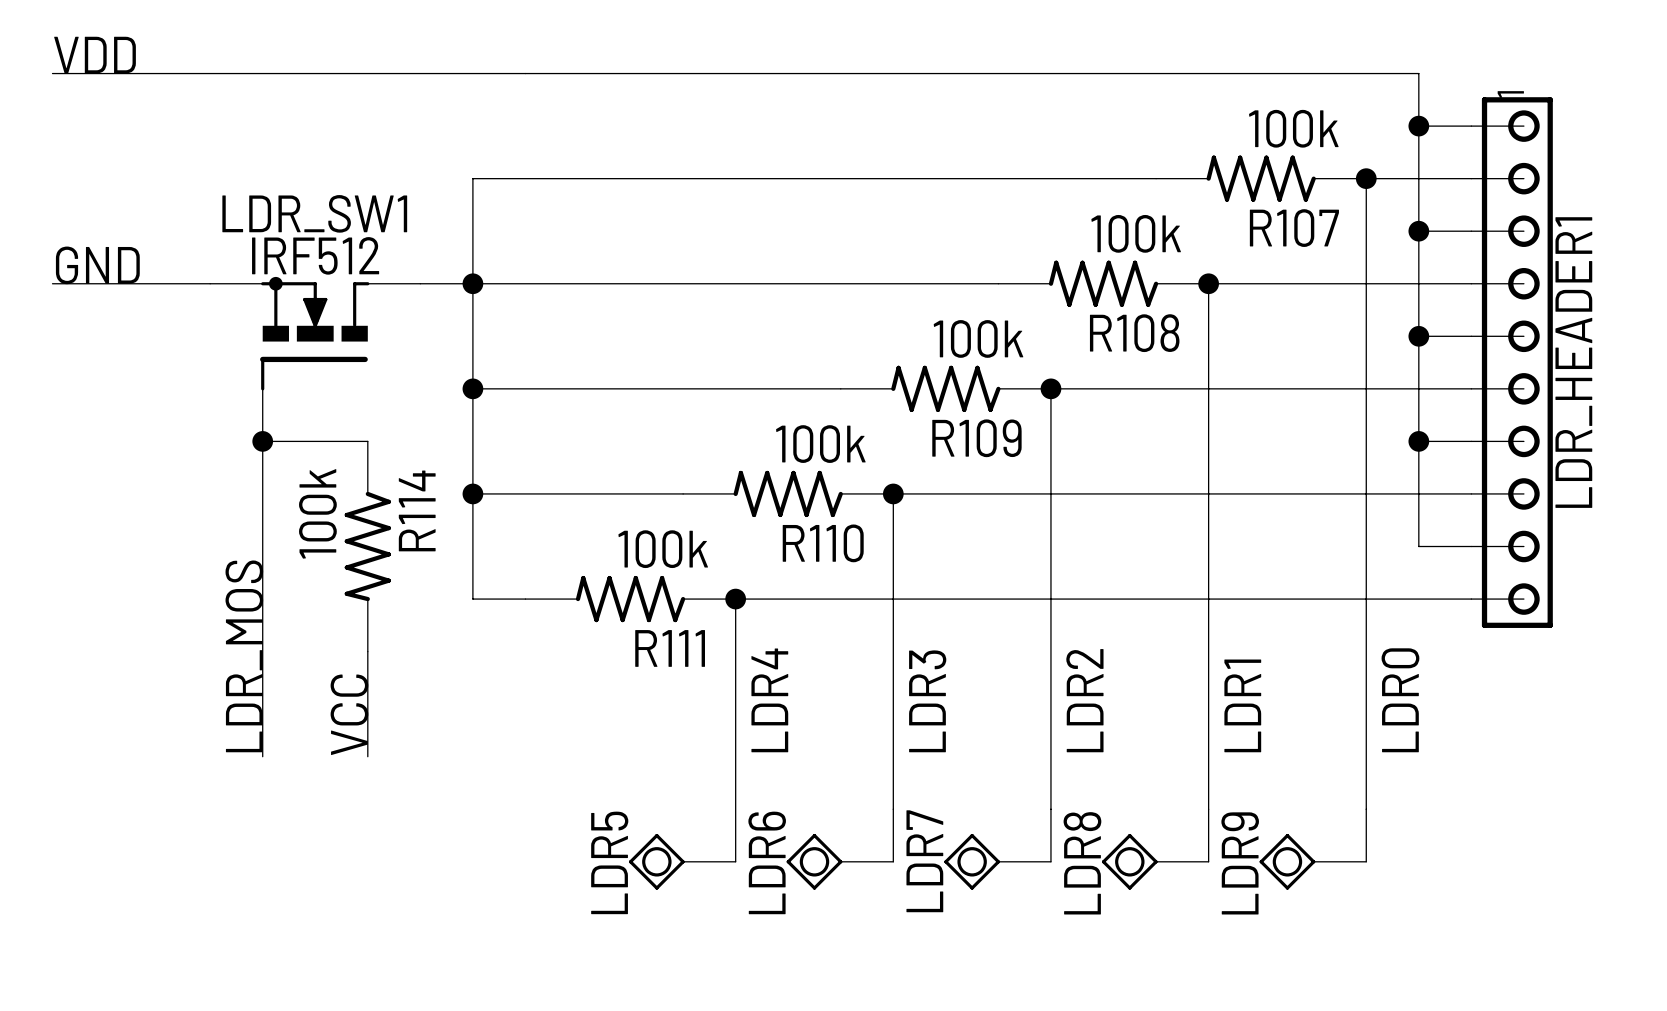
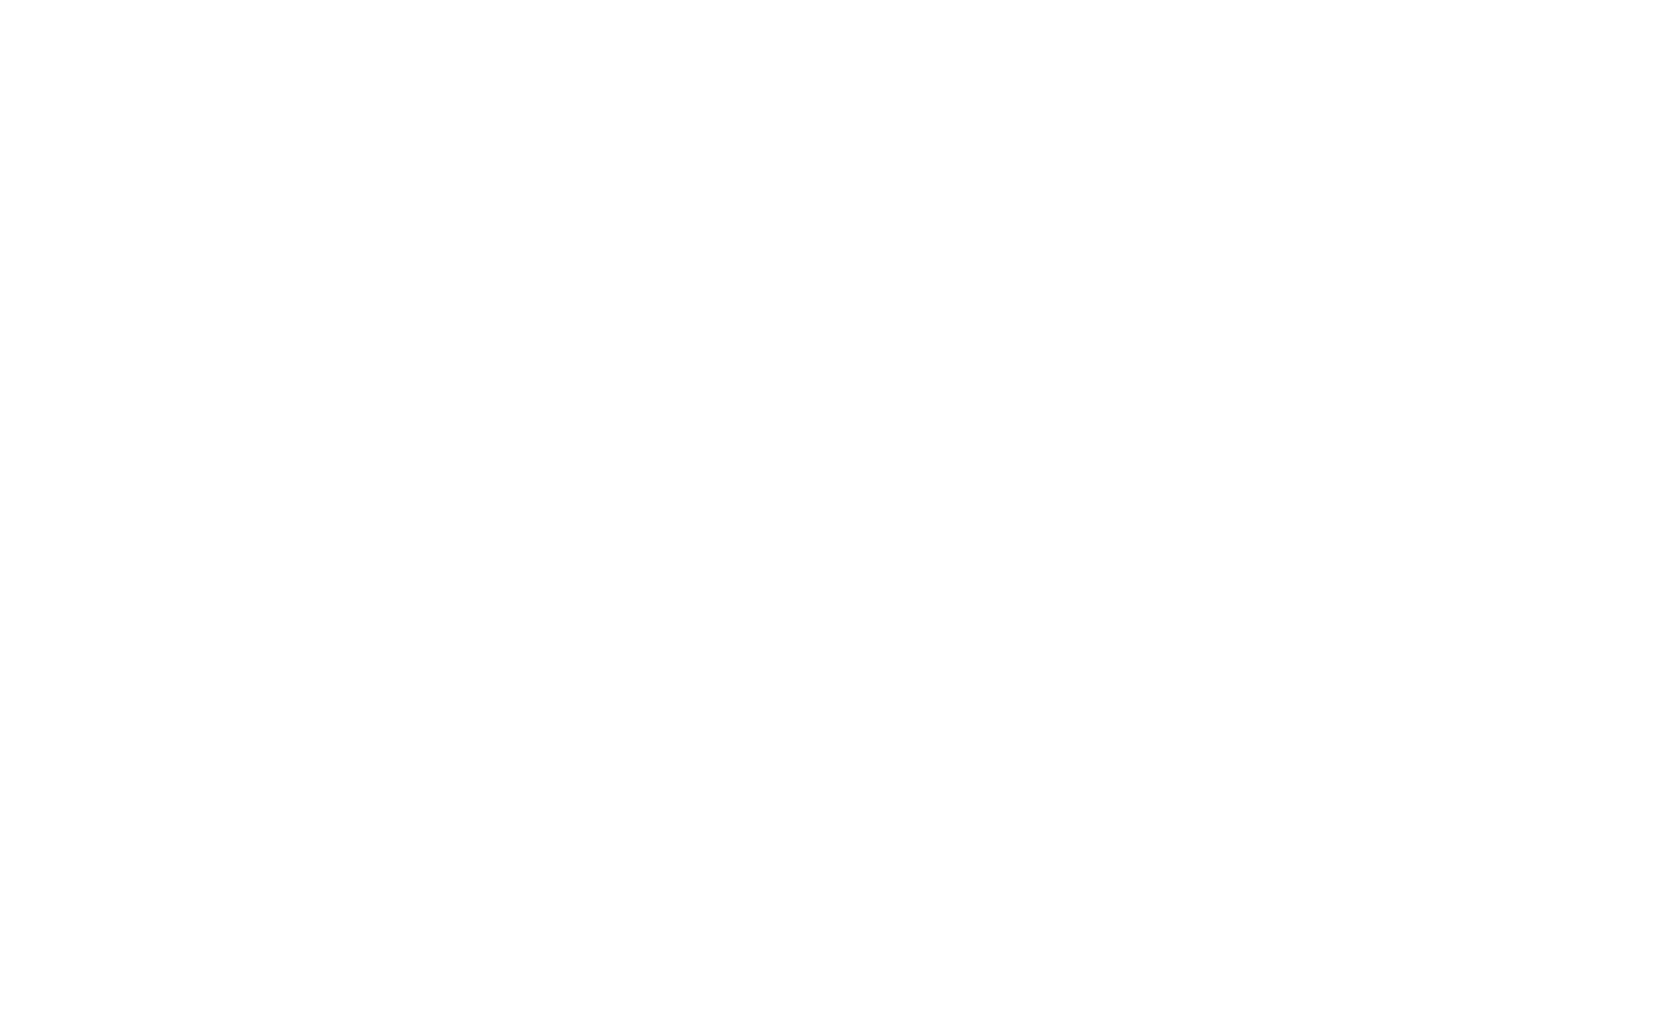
label: VDD (95, 55) -> none
wire: (52, 73) (1418, 73) (1418, 546) (1471, 546) -> none
wire: (1418, 126) (1471, 126) -> none
junction: (1418, 126) -> none
wire: (1156, 178) (472, 178) (472, 599) (525, 599) -> none
R107: 100k (1261, 178) -> none
junction: (1366, 178) -> none
wire: (1471, 178) (1366, 178) (1366, 861) -> none
wire: (1418, 231) (1471, 231) -> none
junction: (1418, 231) -> none
label: GND (97, 265) -> none
wire: (52, 283) (210, 283) -> none
wire: (420, 283) (998, 283) -> none
junction: (472, 283) -> none
R108: 100k (1103, 283) -> none
junction: (1208, 283) -> none
wire: (1471, 283) (1208, 283) (1208, 861) -> none
LDR_SW1: IRF512 (315, 333) -> none
wire: (1418, 336) (1471, 336) -> none
junction: (1418, 336) -> none
LDR_HEADER1: (1512, 362) -> none
wire: (262, 388) (262, 756) -> none
wire: (472, 388) (840, 388) -> none
junction: (472, 388) -> none
R109: 100k (945, 388) -> none
junction: (1050, 388) -> none
wire: (1471, 388) (1050, 388) (1050, 861) -> none
wire: (262, 441) (367, 441) -> none
junction: (262, 441) -> none
wire: (1418, 441) (1471, 441) -> none
junction: (1418, 441) -> none
wire: (472, 493) (683, 493) -> none
junction: (472, 493) -> none
R110: 100k (788, 493) -> none
junction: (893, 493) -> none
wire: (1471, 493) (893, 493) (893, 861) -> none
R114: 100k (367, 546) -> none
R111: 100k (630, 599) -> none
junction: (735, 599) -> none
wire: (1471, 599) (735, 599) (735, 861) -> none
wire: (367, 651) (367, 756) -> none
label: LDR_MOS (244, 656) -> none
label: LDR4 (769, 700) -> none
label: LDR2 (1084, 700) -> none
label: LDR0 (1400, 700) -> none
label: LDR3 (927, 701) -> none
label: LDR1 (1242, 705) -> none
label: VCC (349, 714) -> none
LDR5: (682, 861) -> none
LDR6: (839, 861) -> none
LDR7: (997, 861) -> none
LDR8: (1155, 861) -> none
LDR9: (1312, 861) -> none

